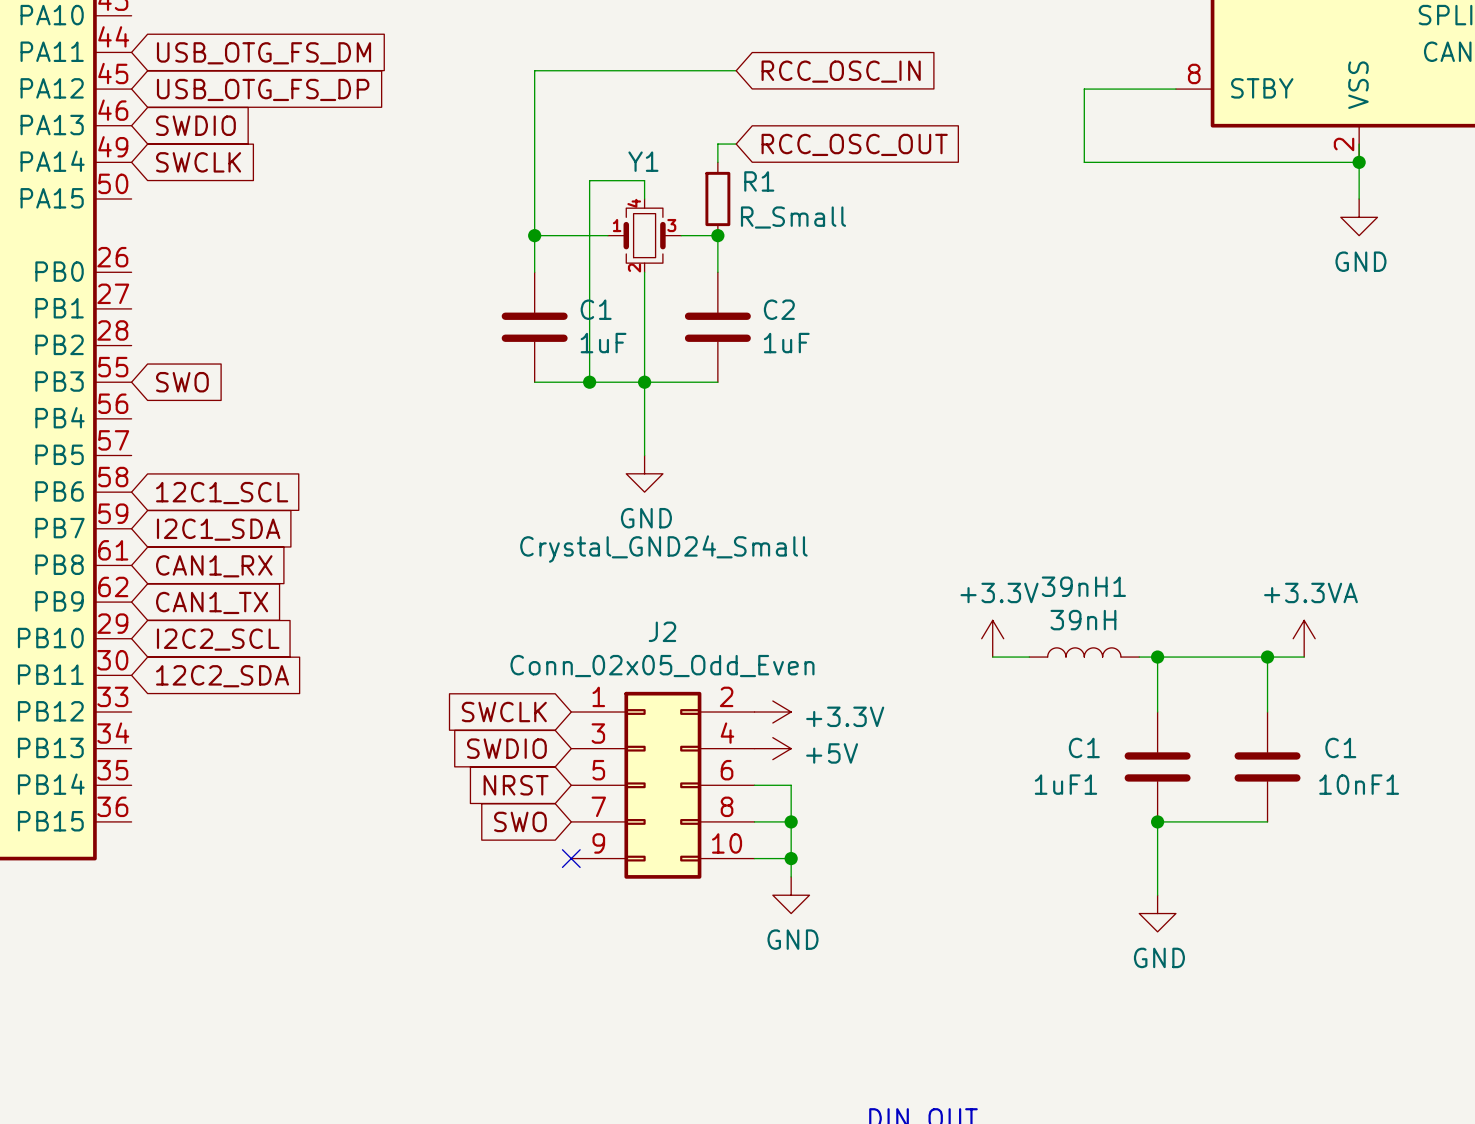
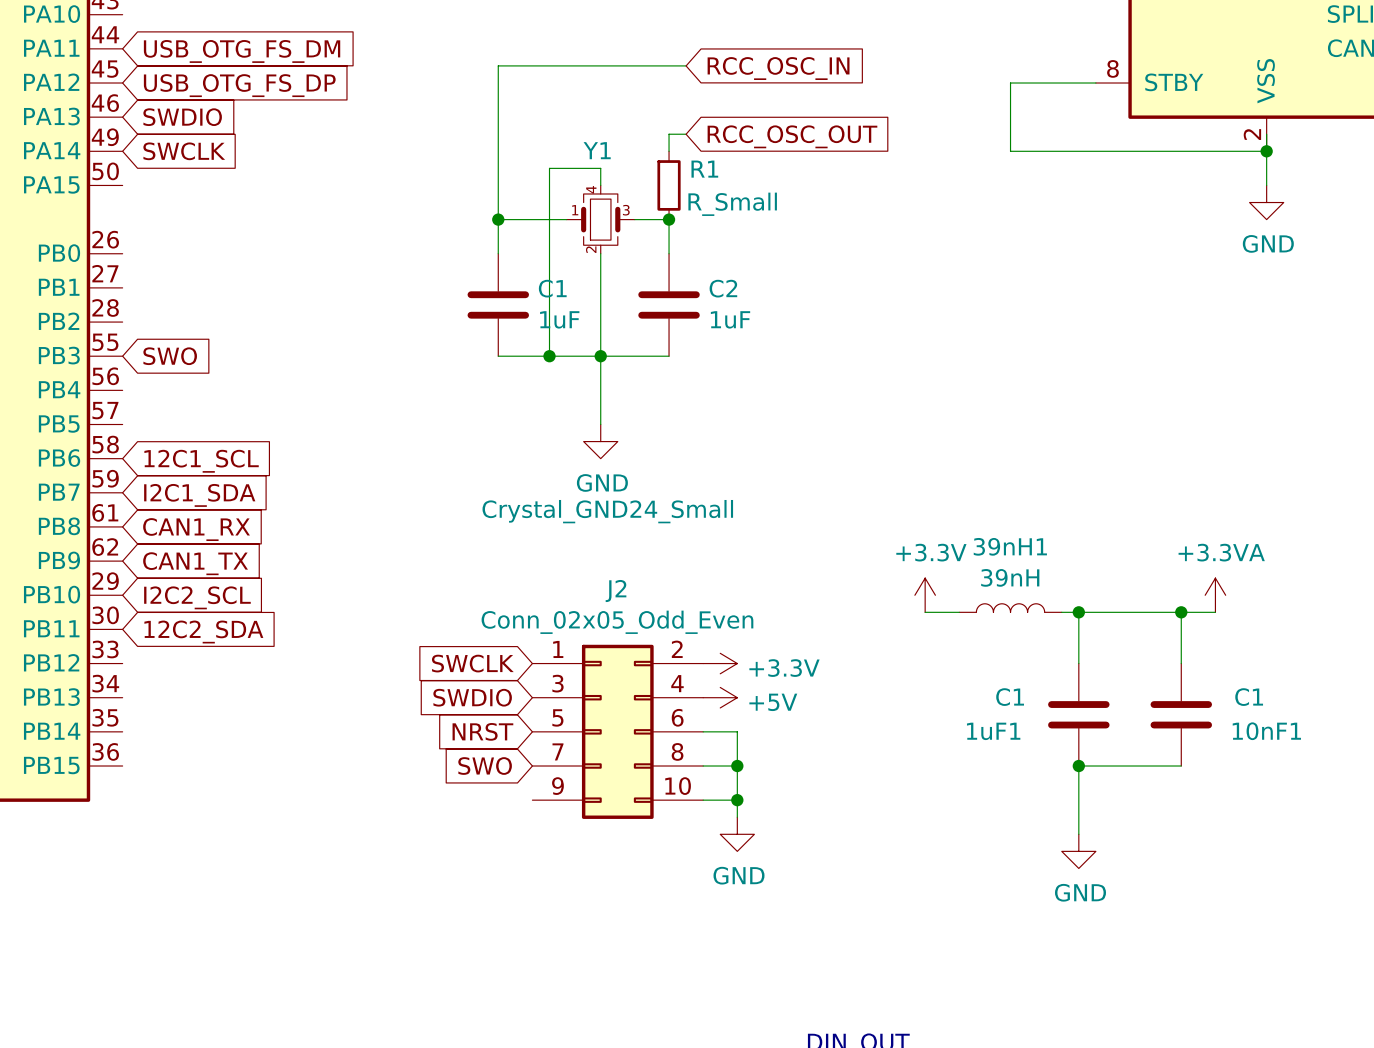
no-connect mark: (571, 858) -> none

